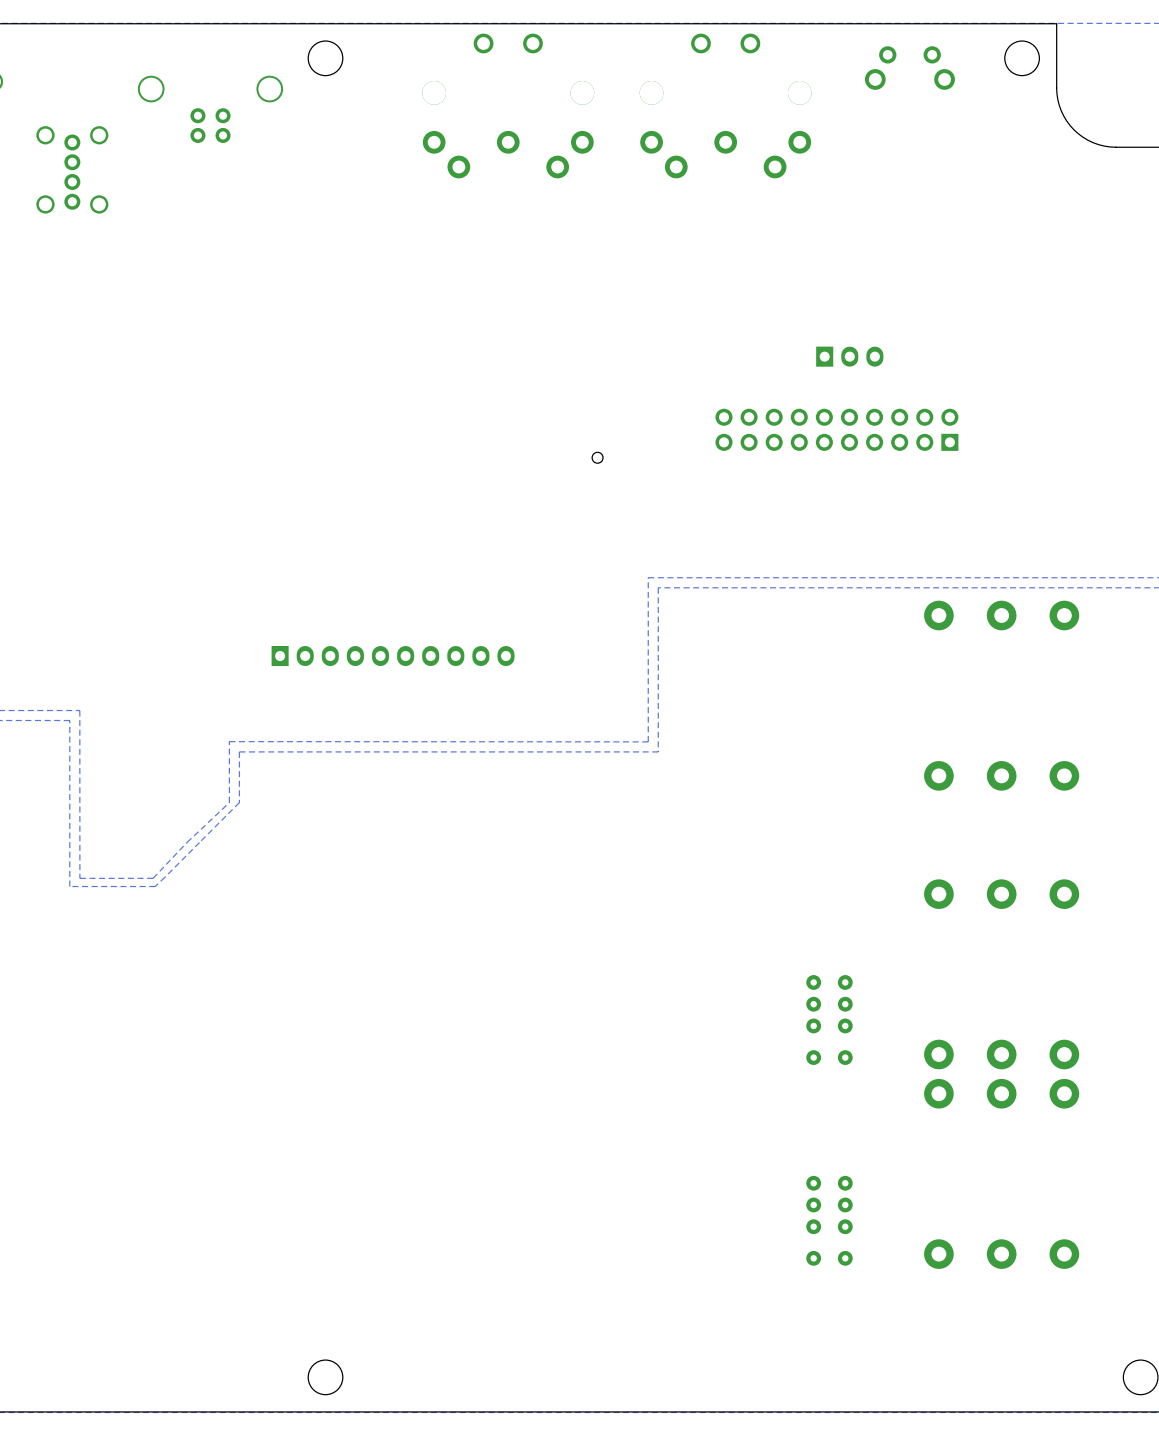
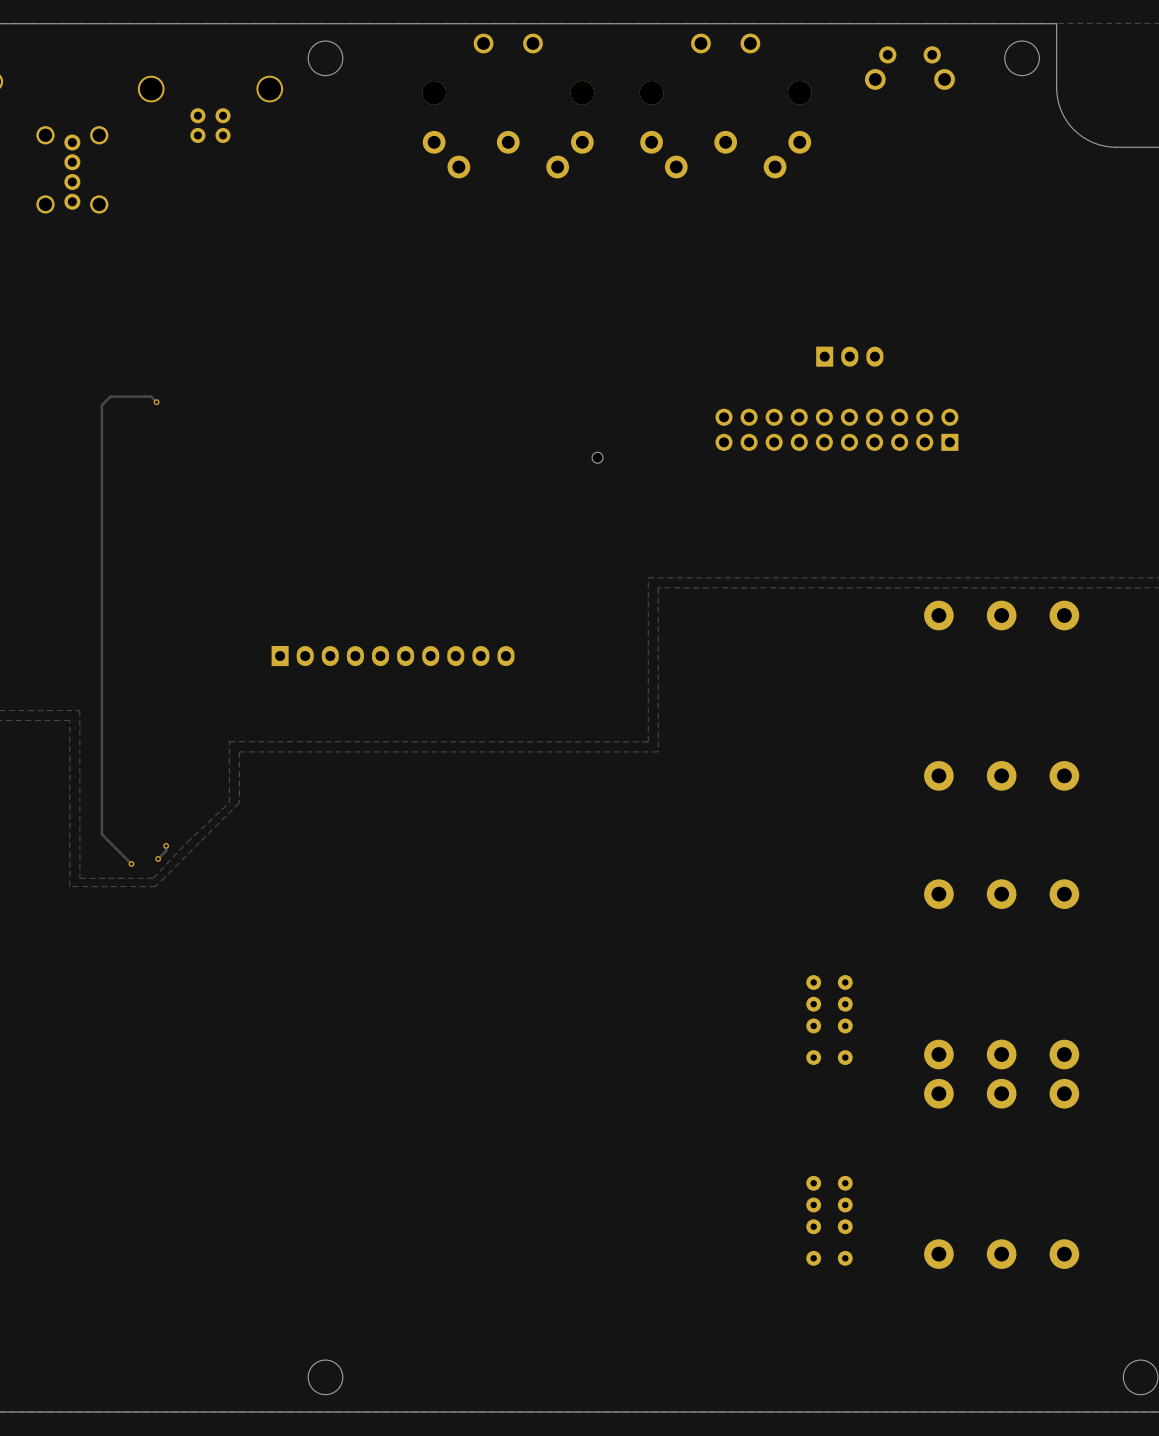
track: none -> (156, 402) (151, 396) (110, 396) (101, 405) (101, 834) (131, 863)
via: none -> (156, 402)
track: none -> (166, 845) (166, 850) (158, 858)
via: none -> (166, 845)
via: none -> (158, 858)
via: none -> (131, 863)

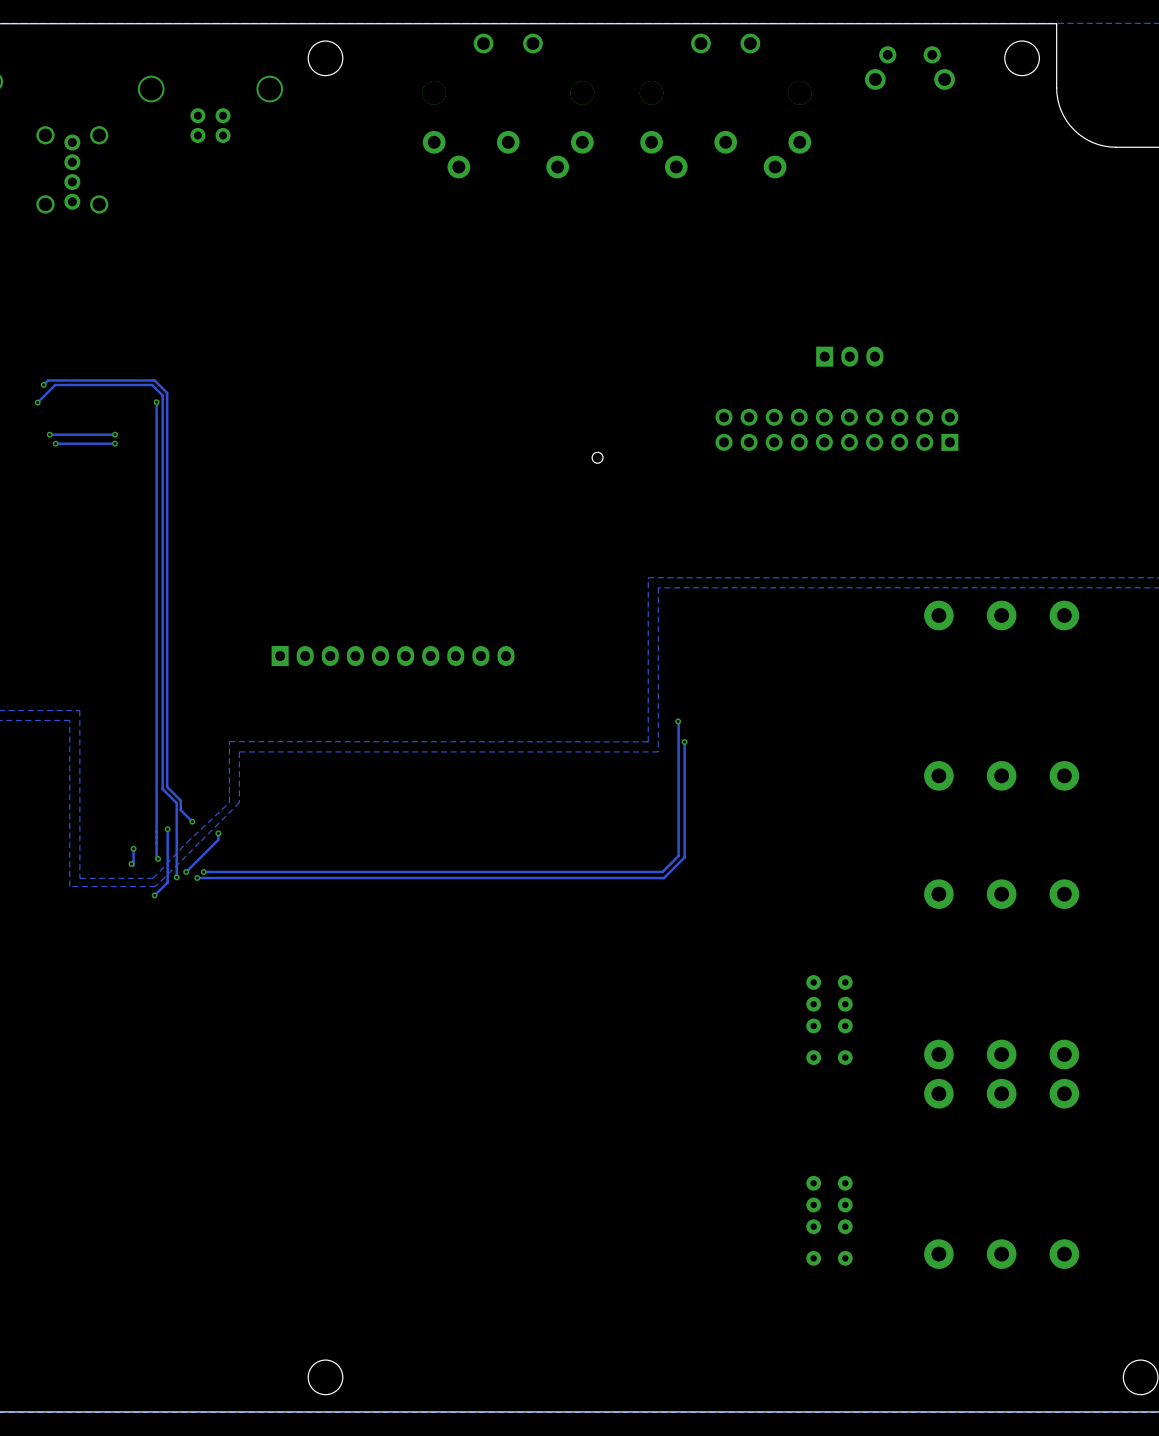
track: none -> (43, 384) (48, 380) (154, 380) (167, 393) (167, 787) (180, 800) (180, 810) (192, 821)
via: none -> (43, 384)
track: none -> (37, 402) (55, 384) (152, 384) (162, 395) (162, 789) (176, 803) (176, 877)
via: none -> (37, 402)
track: (156, 402) (151, 396) (110, 396) (101, 405) (101, 834) (131, 863) -> (156, 402) (157, 859)
via: none -> (49, 434)
track: none -> (114, 434) (49, 434)
via: none -> (114, 434)
via: none -> (55, 443)
track: none -> (114, 443) (55, 443)
via: none -> (114, 443)
track: none -> (678, 721) (678, 855) (662, 871) (203, 871)
via: none -> (678, 721)
track: none -> (684, 741) (684, 857) (664, 878) (197, 878)
via: none -> (684, 741)
via: none -> (192, 821)
track: none -> (167, 829) (167, 882) (154, 895)
via: none -> (167, 829)
track: none -> (218, 833) (218, 839) (186, 871)
via: none -> (218, 833)
track: (166, 845) (166, 850) (158, 858) -> none
via: (166, 845) -> none
track: none -> (133, 848) (133, 865)
via: none -> (133, 848)
via: none -> (186, 871)
via: none -> (203, 871)
via: none -> (176, 877)
via: none -> (197, 878)
via: none -> (154, 895)

